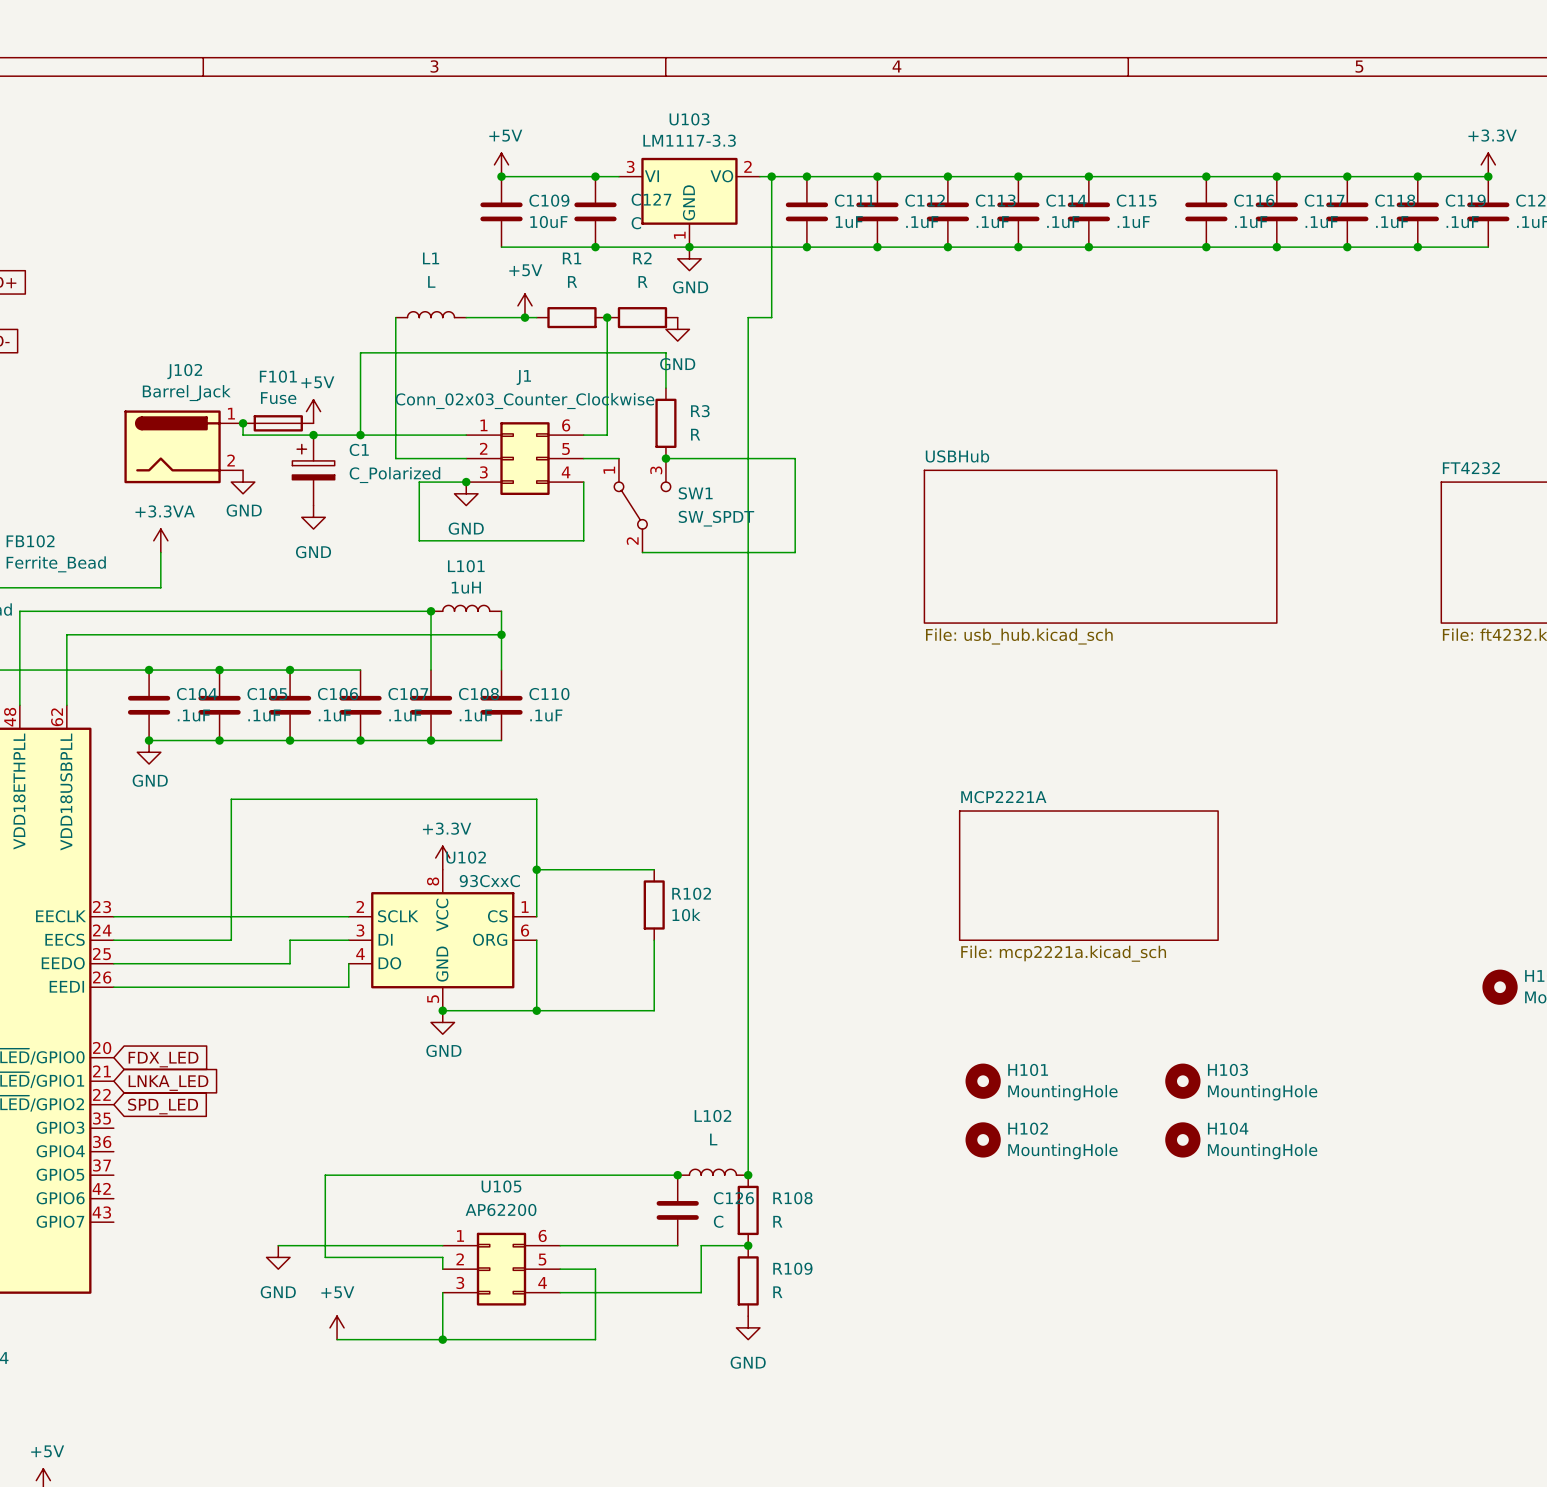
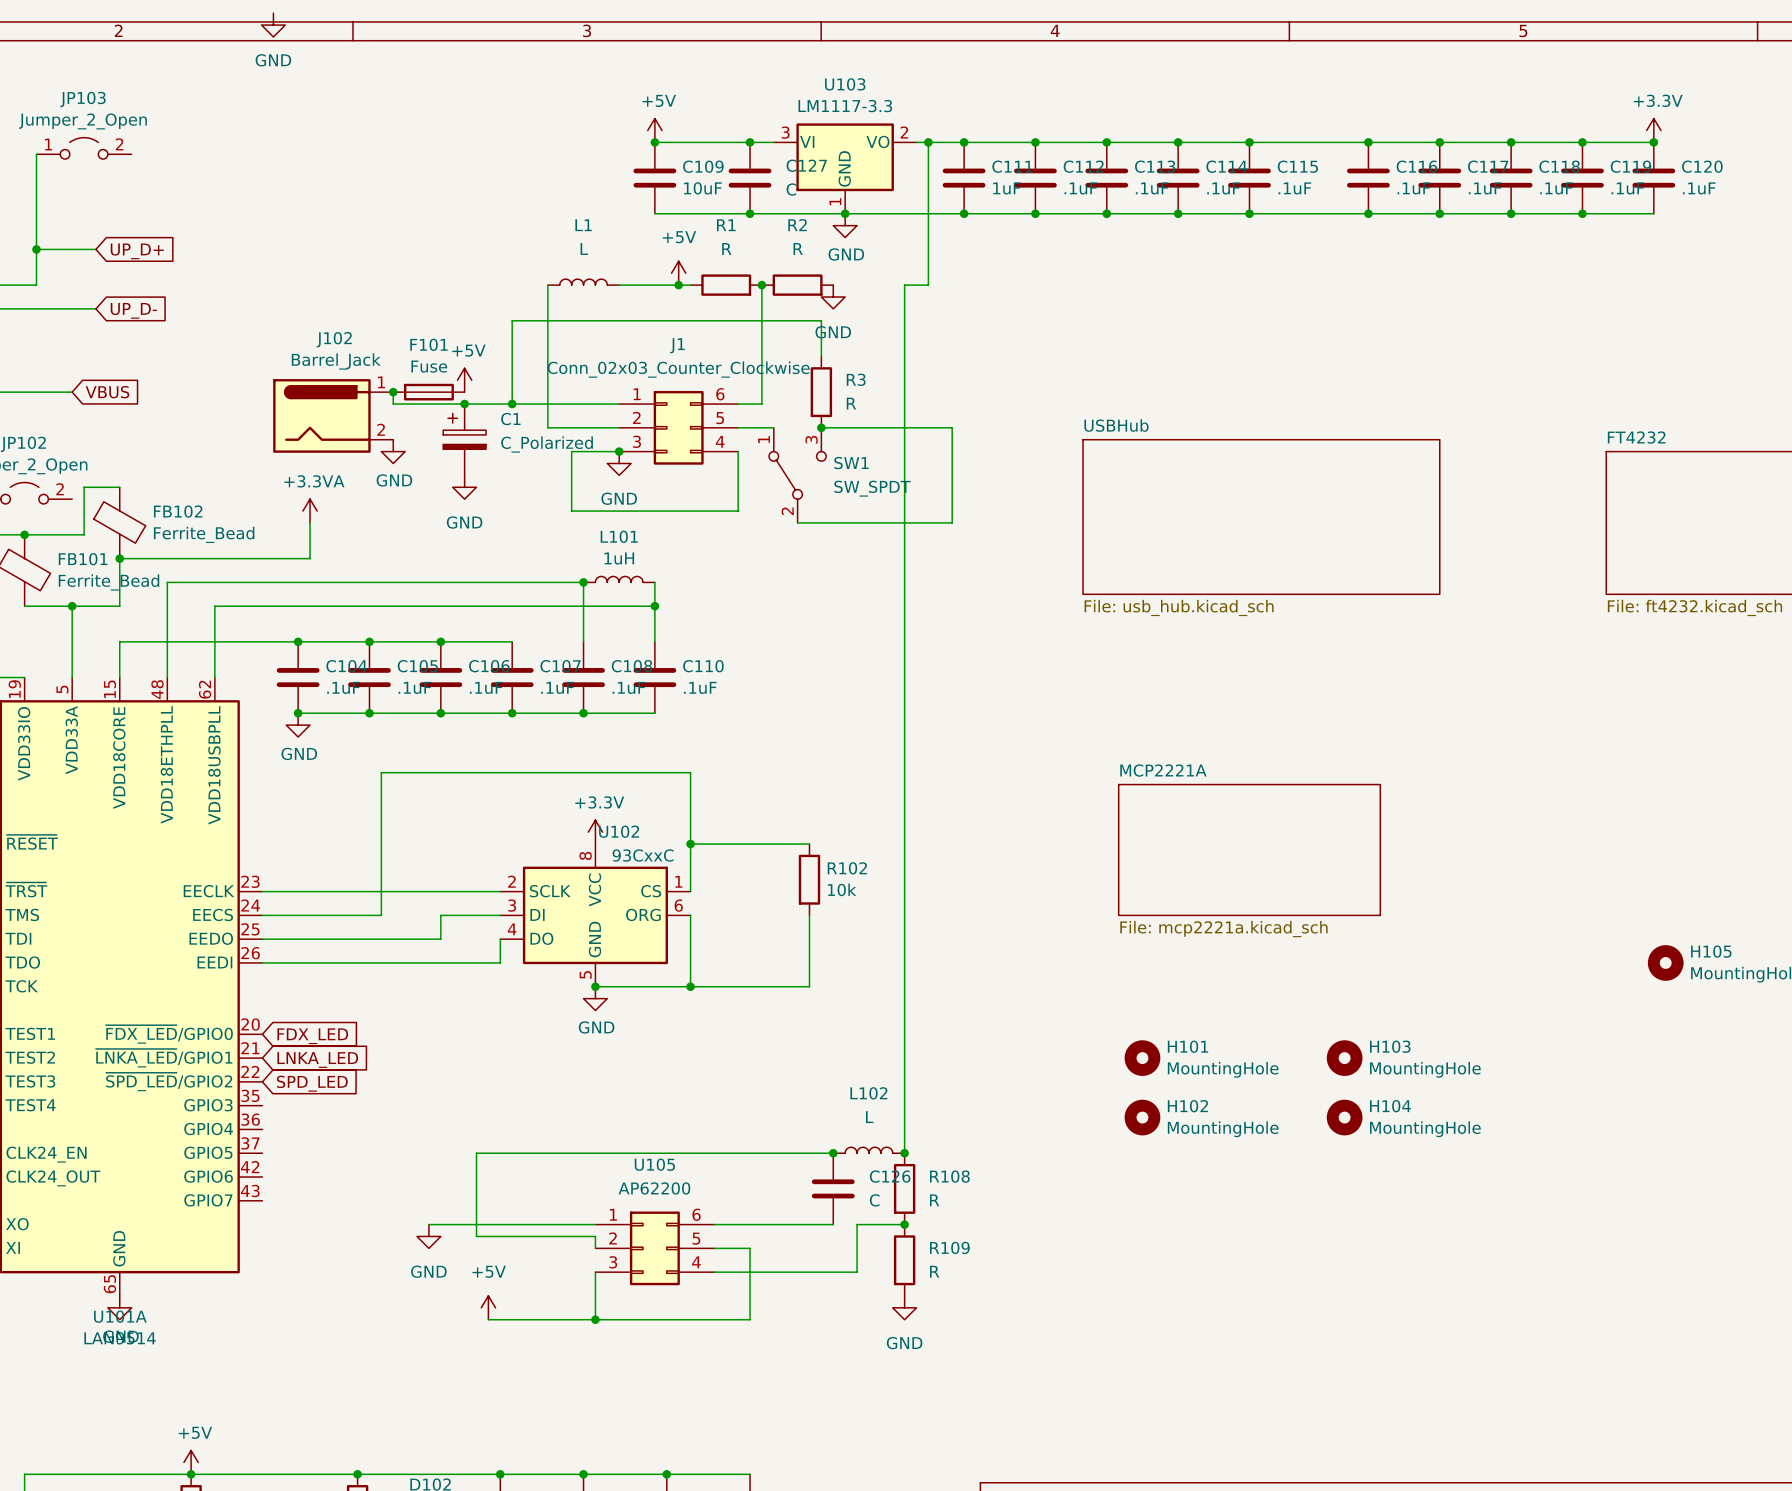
power symbol: none -> GND (273, 25)

